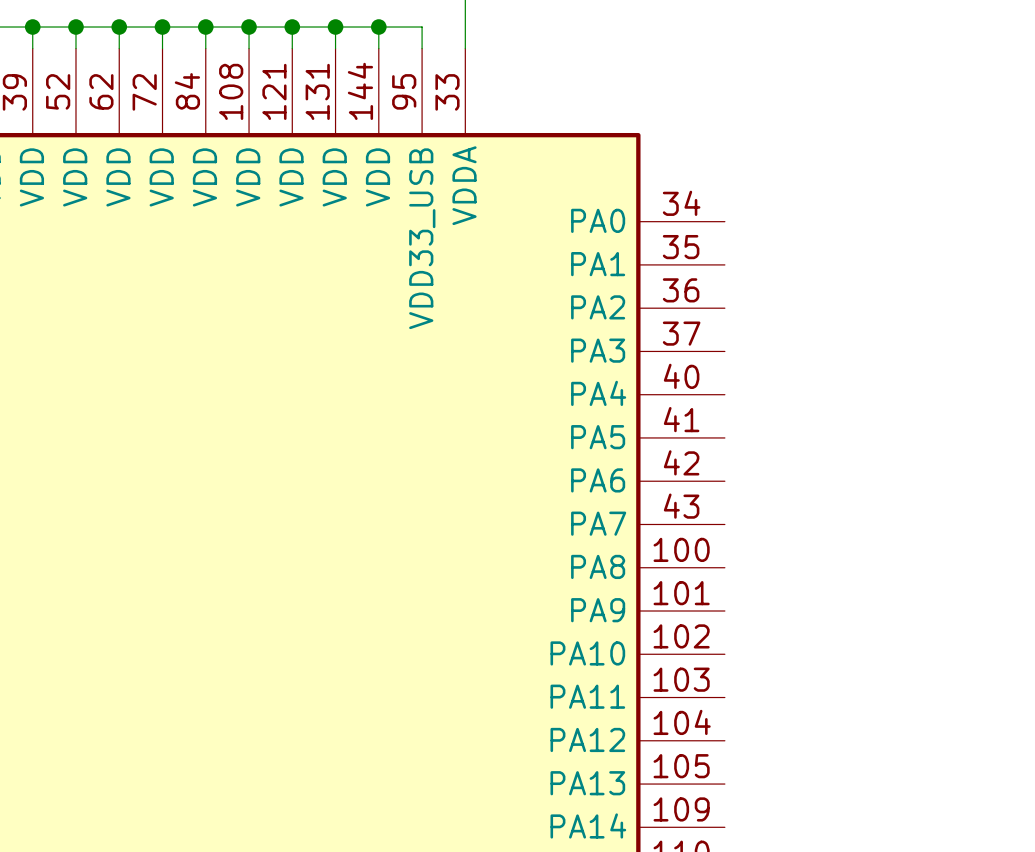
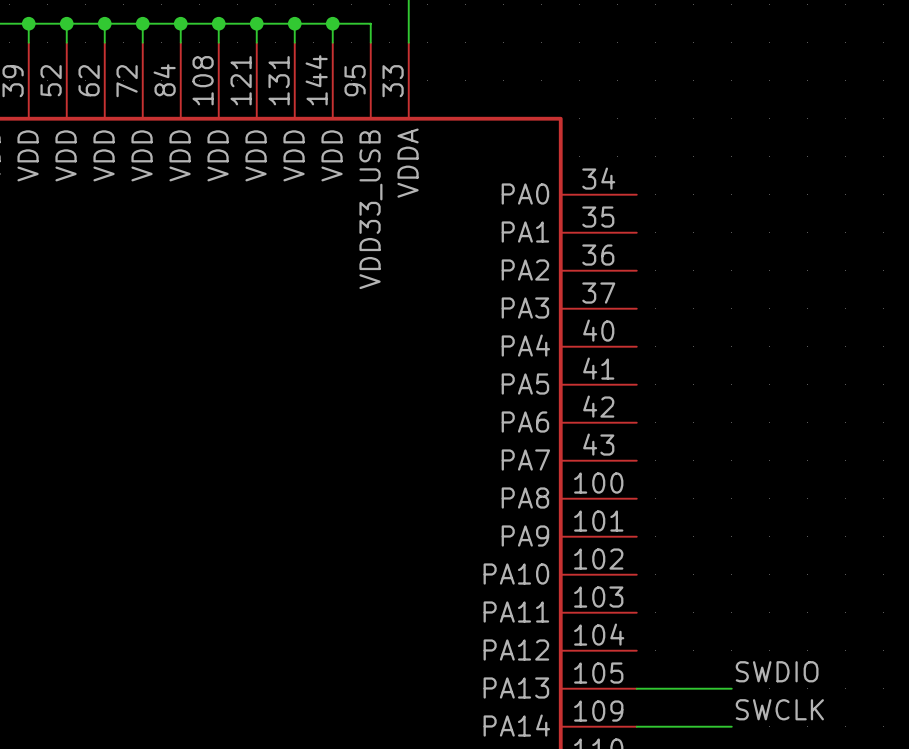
label: none -> SWDIO (777, 671)
wire: none -> (636, 688) (731, 688)
label: none -> SWCLK (779, 709)
wire: none -> (636, 726) (731, 726)

